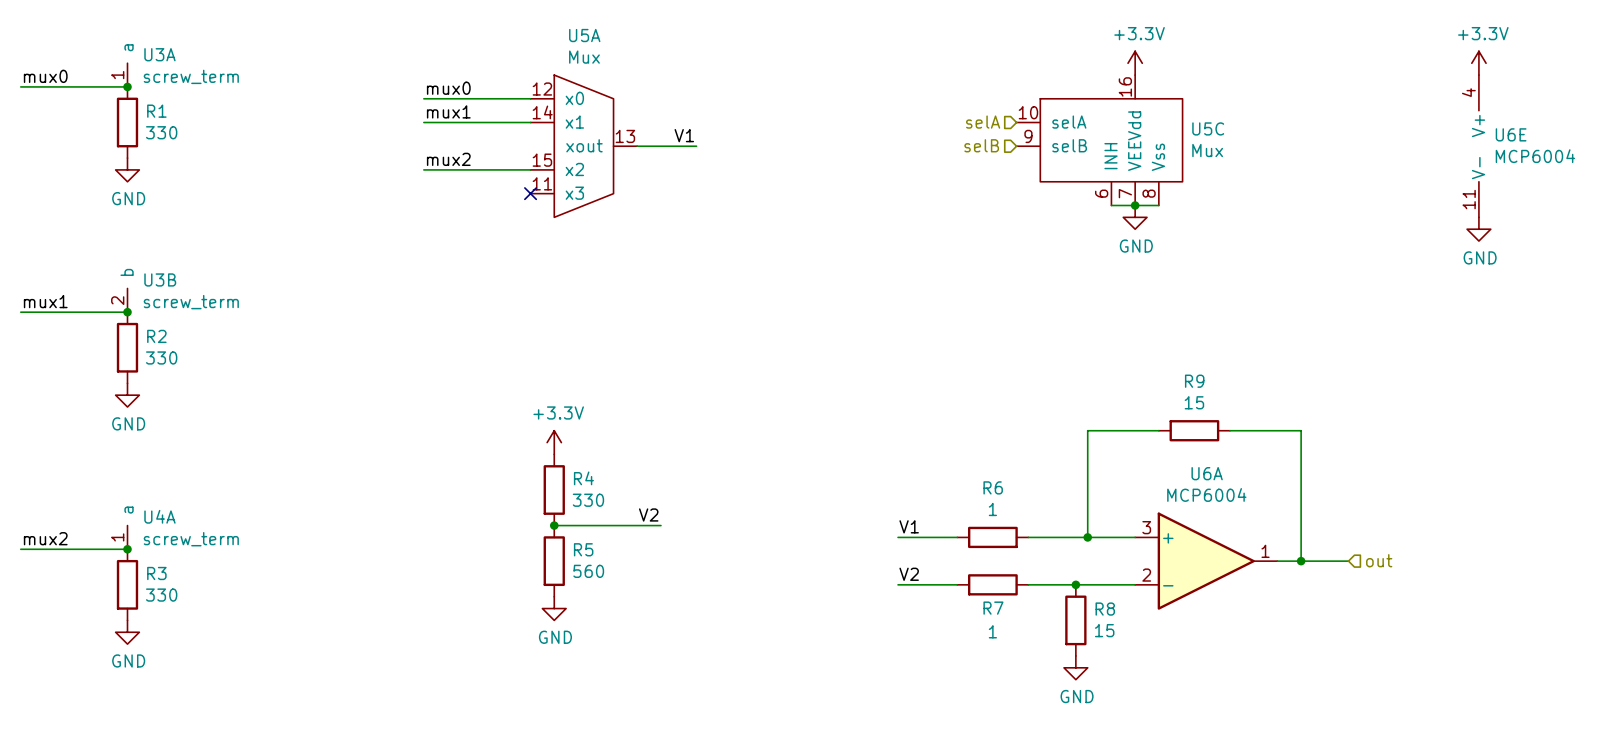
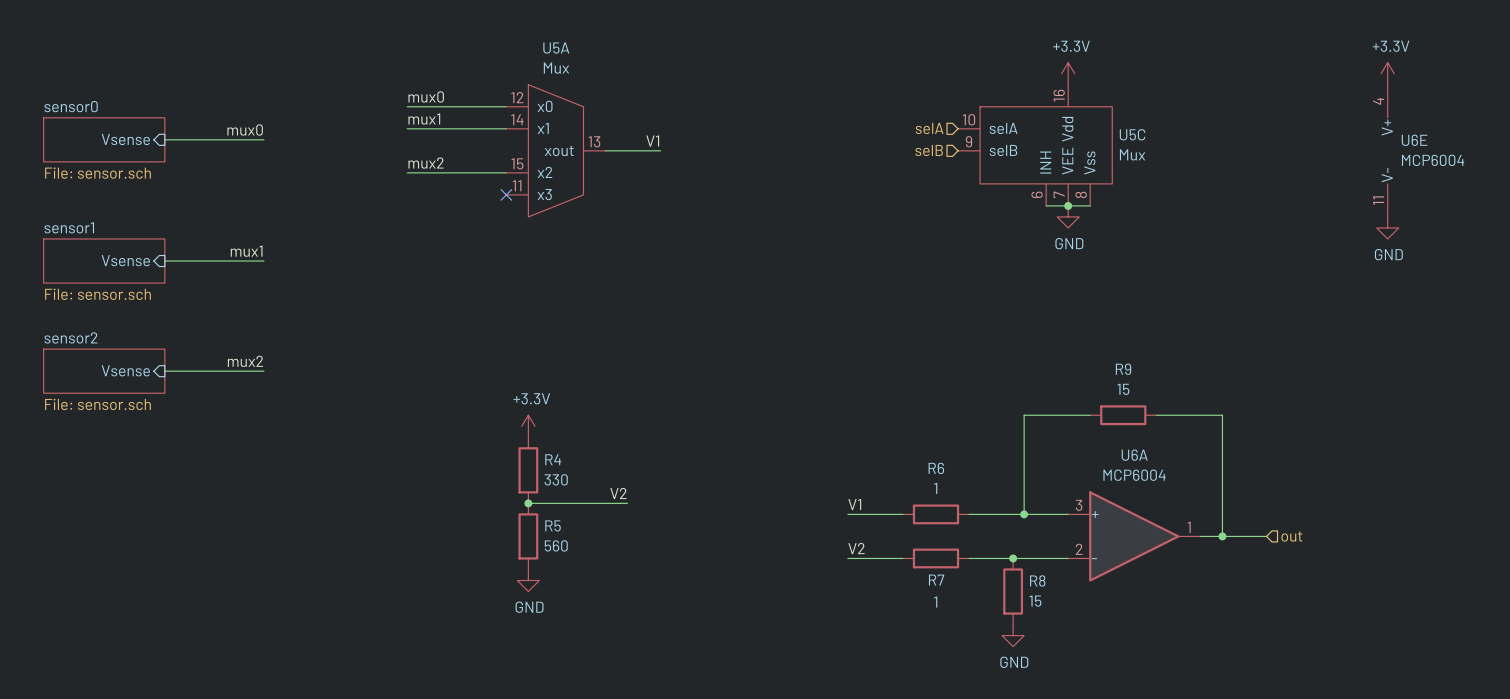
U3A: screw_term (127, 75) -> none
label: mux0 (45, 76) -> none
wire: (20, 86) (127, 86) -> (164, 139) (263, 139)
junction: (127, 86) -> none
R1: 330 (127, 122) -> none
label: none -> mux0 (245, 130)
sheet pin: none -> Vsense (125, 139)
sheet sensor0: none -> File: sensor.sch (104, 139)
power symbol: GND (127, 169) -> none
label: none -> mux1 (246, 251)
sheet sensor1: none -> File: sensor.sch (104, 261)
sheet pin: none -> Vsense (125, 260)
U3B: screw_term (127, 300) -> none
label: mux1 (45, 301) -> none
wire: (20, 312) (127, 312) -> (164, 261) (263, 261)
junction: (127, 312) -> none
R2: 330 (127, 347) -> none
label: none -> mux2 (245, 361)
sheet pin: none -> Vsense (125, 370)
sheet sensor2: none -> File: sensor.sch (104, 371)
power symbol: GND (127, 395) -> none
U4A: screw_term (127, 537) -> none
label: mux2 (45, 538) -> none
wire: (20, 549) (127, 549) -> (164, 371) (263, 371)
junction: (127, 549) -> none
R3: 330 (127, 584) -> none
power symbol: GND (127, 632) -> none

